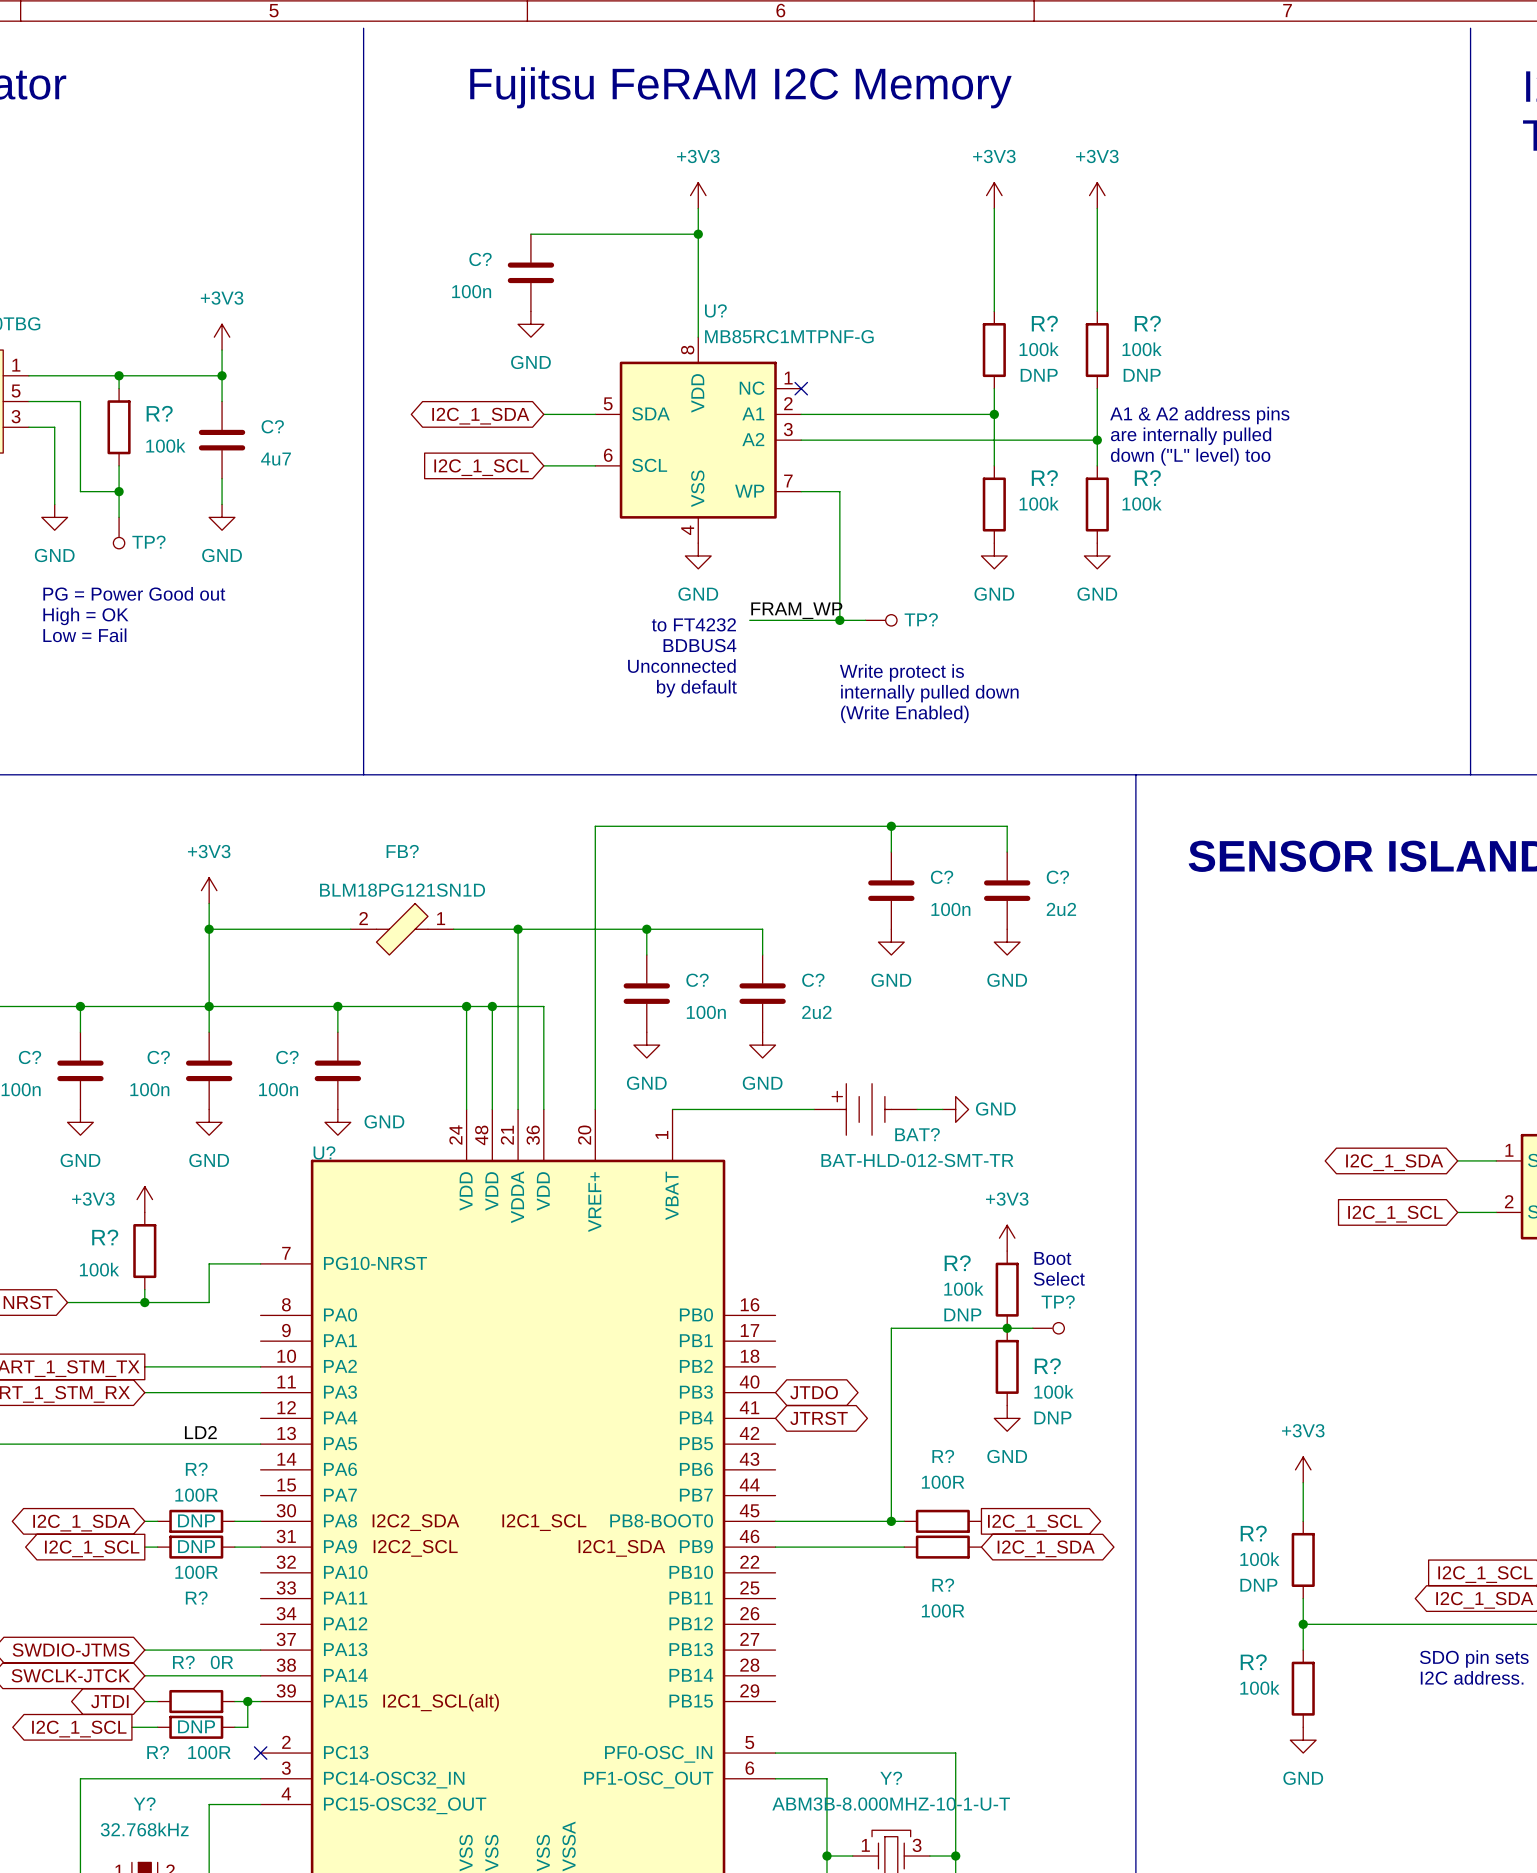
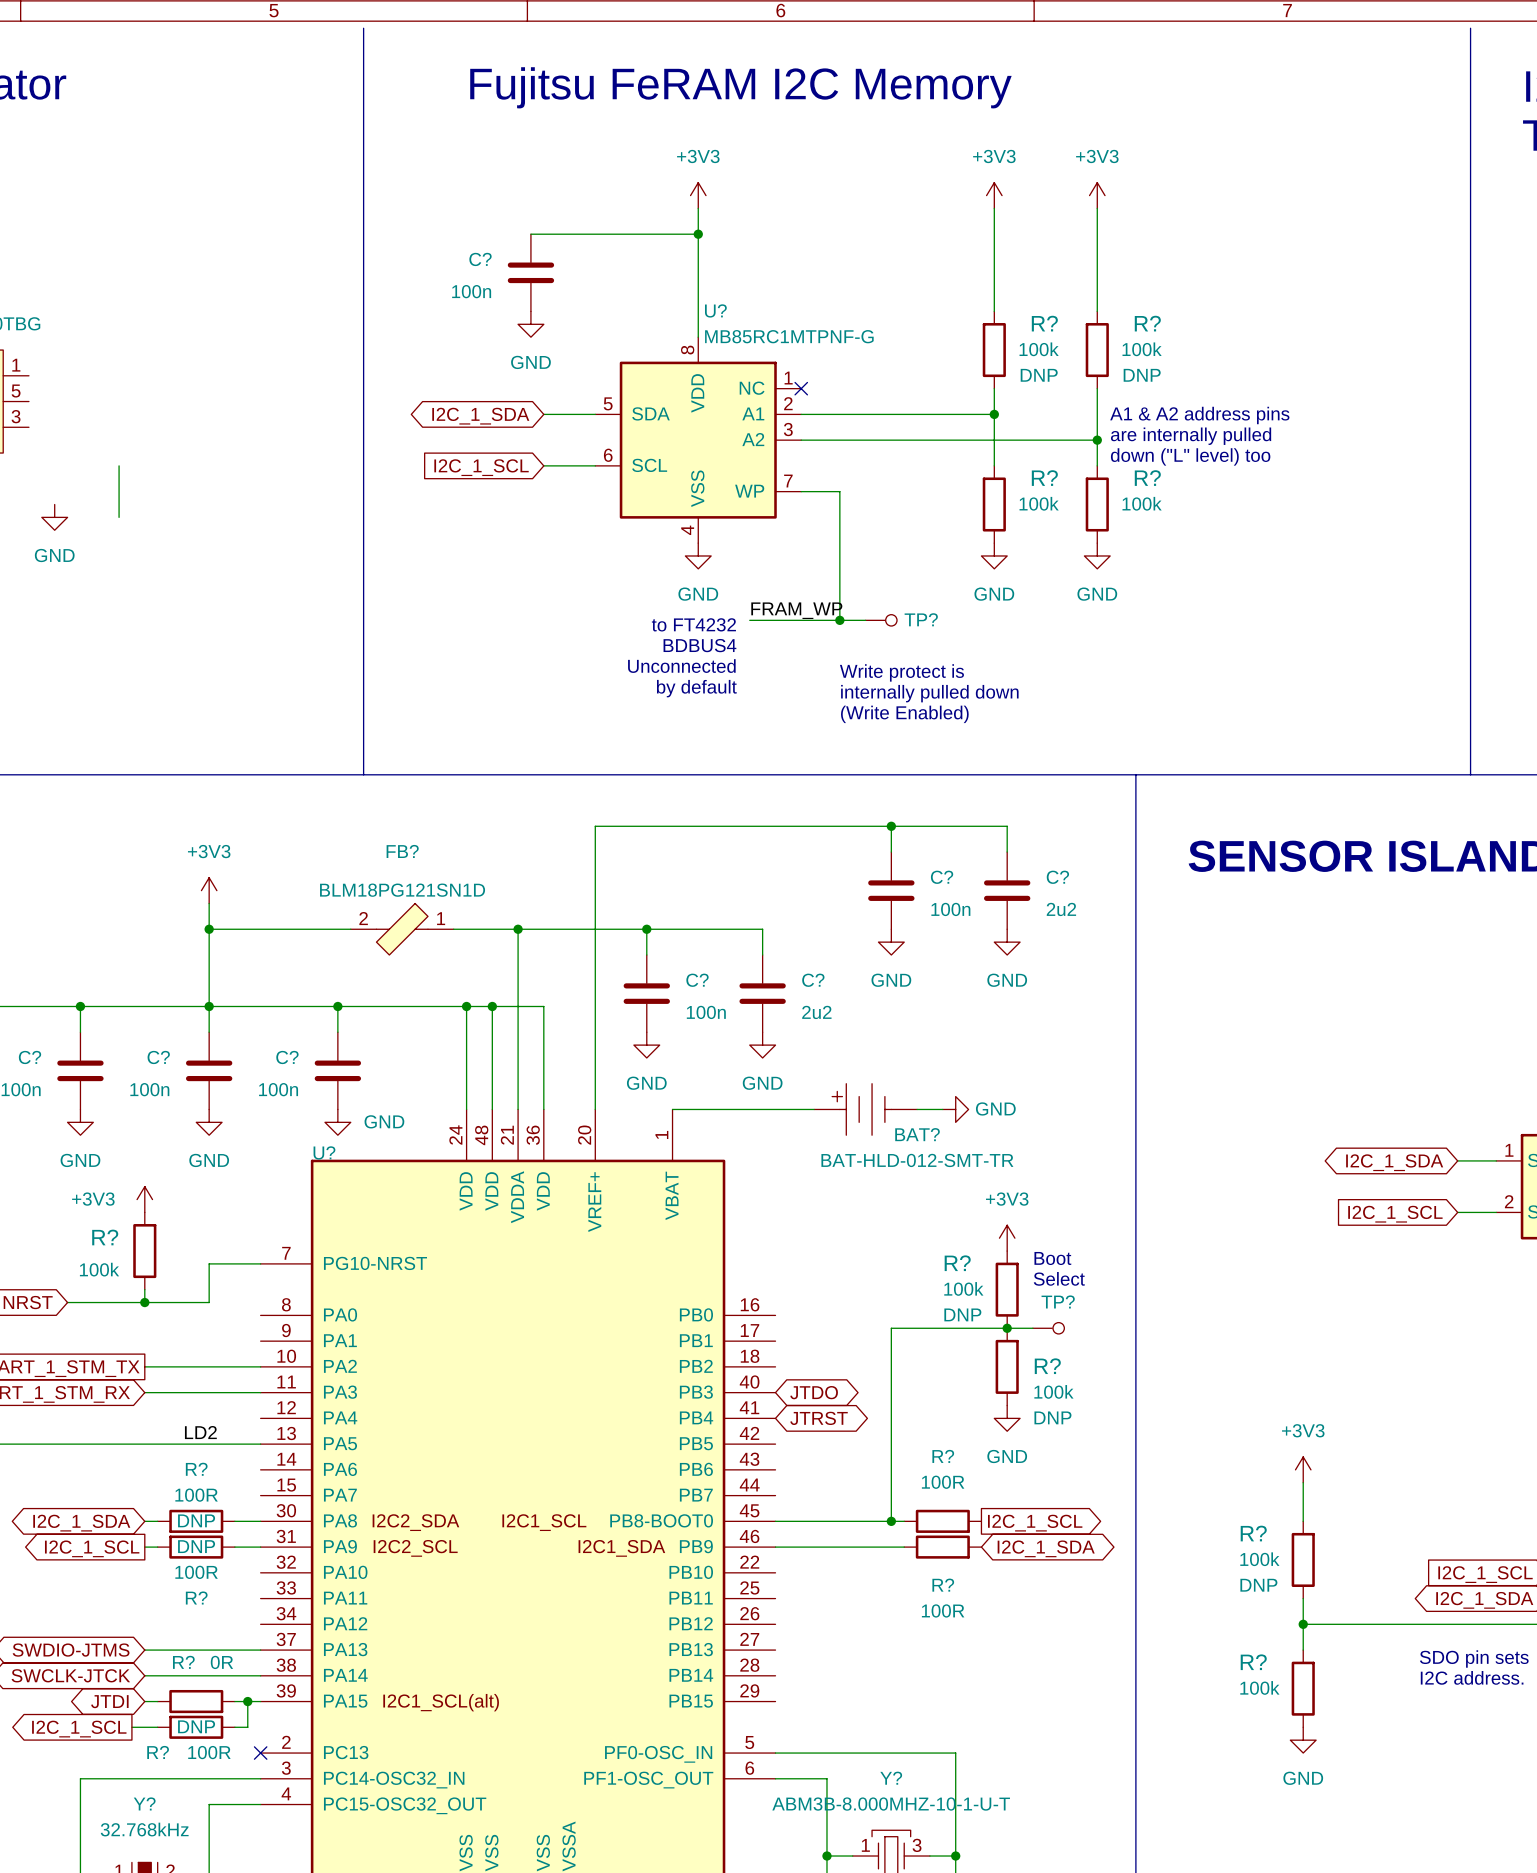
power symbol: +3V3 (222, 337) -> none
wire: (222, 350) (222, 401) -> none
wire: (28, 375) (222, 375) -> none
wire: (119, 375) (119, 388) -> none
junction: (119, 375) -> none
junction: (222, 375) -> none
wire: (28, 401) (80, 401) (80, 491) (119, 491) -> none
wire: (28, 427) (54, 427) (54, 504) -> none
R?: (119, 427) -> none
C?: (222, 440) -> none
wire: (222, 478) (222, 504) -> none
junction: (119, 491) -> none
power symbol: GND (222, 517) -> none
TP?: (119, 533) -> none
text: PG = Power Good out (134, 593) -> none
text: High = OK (85, 616) -> none
text: Low = Fail (84, 635) -> none

